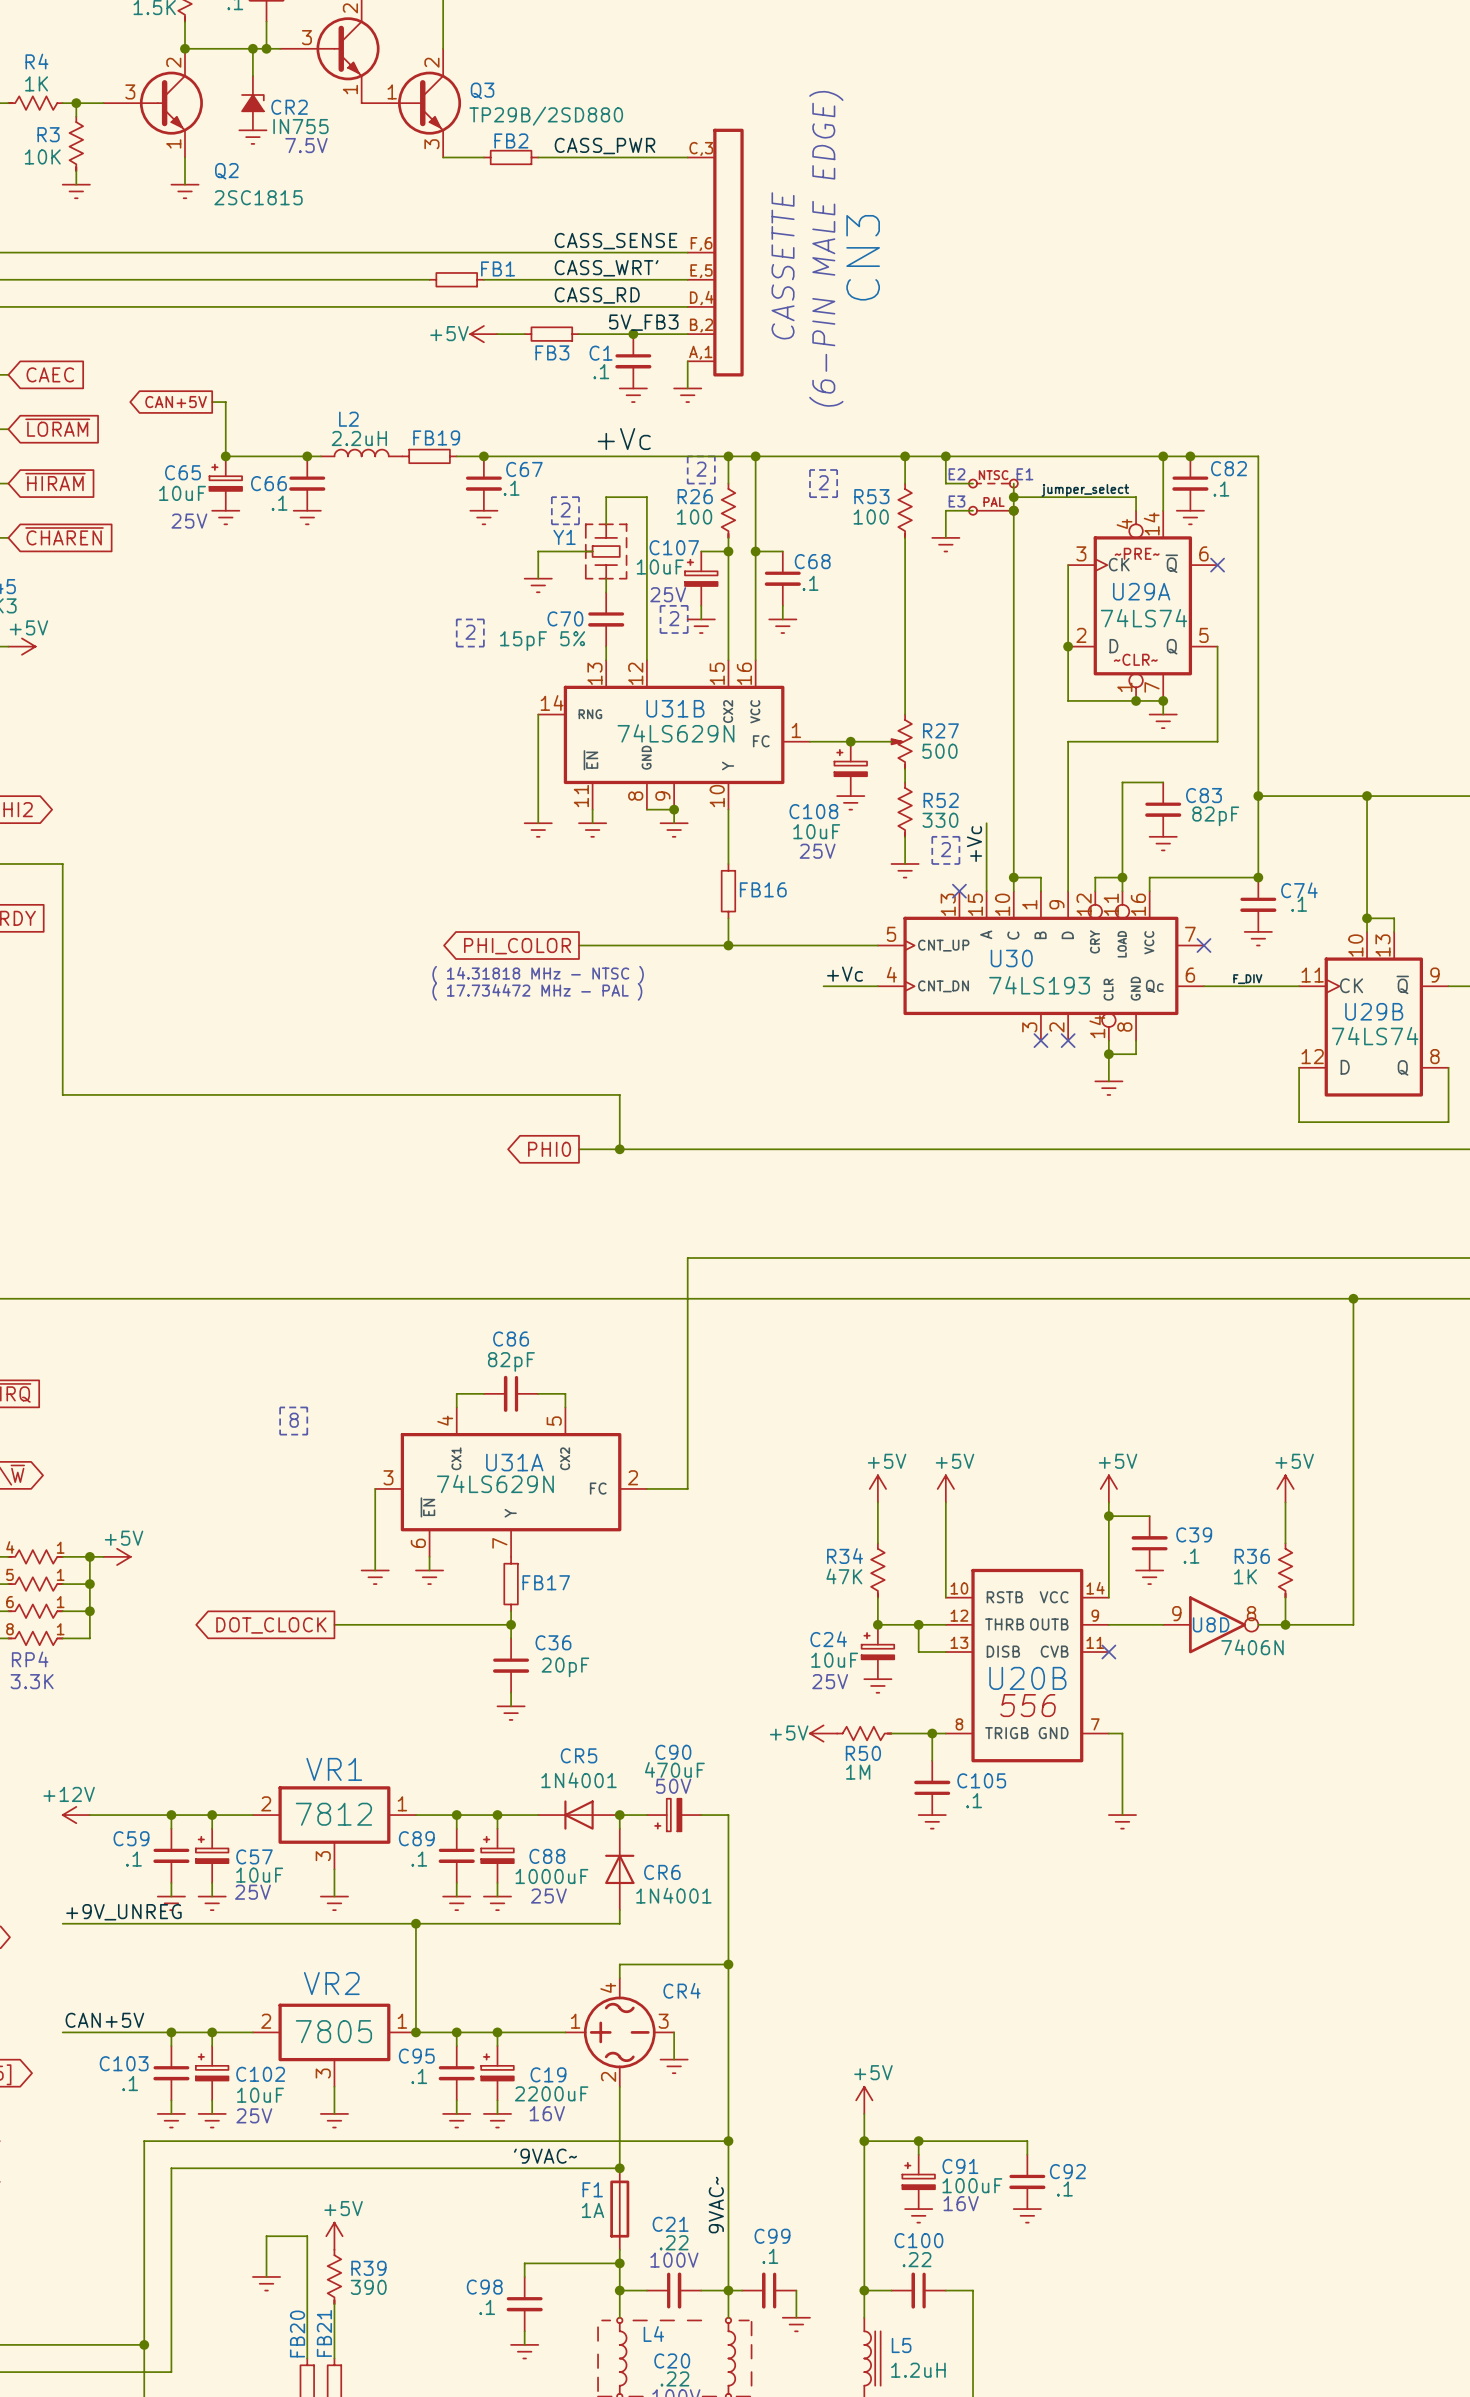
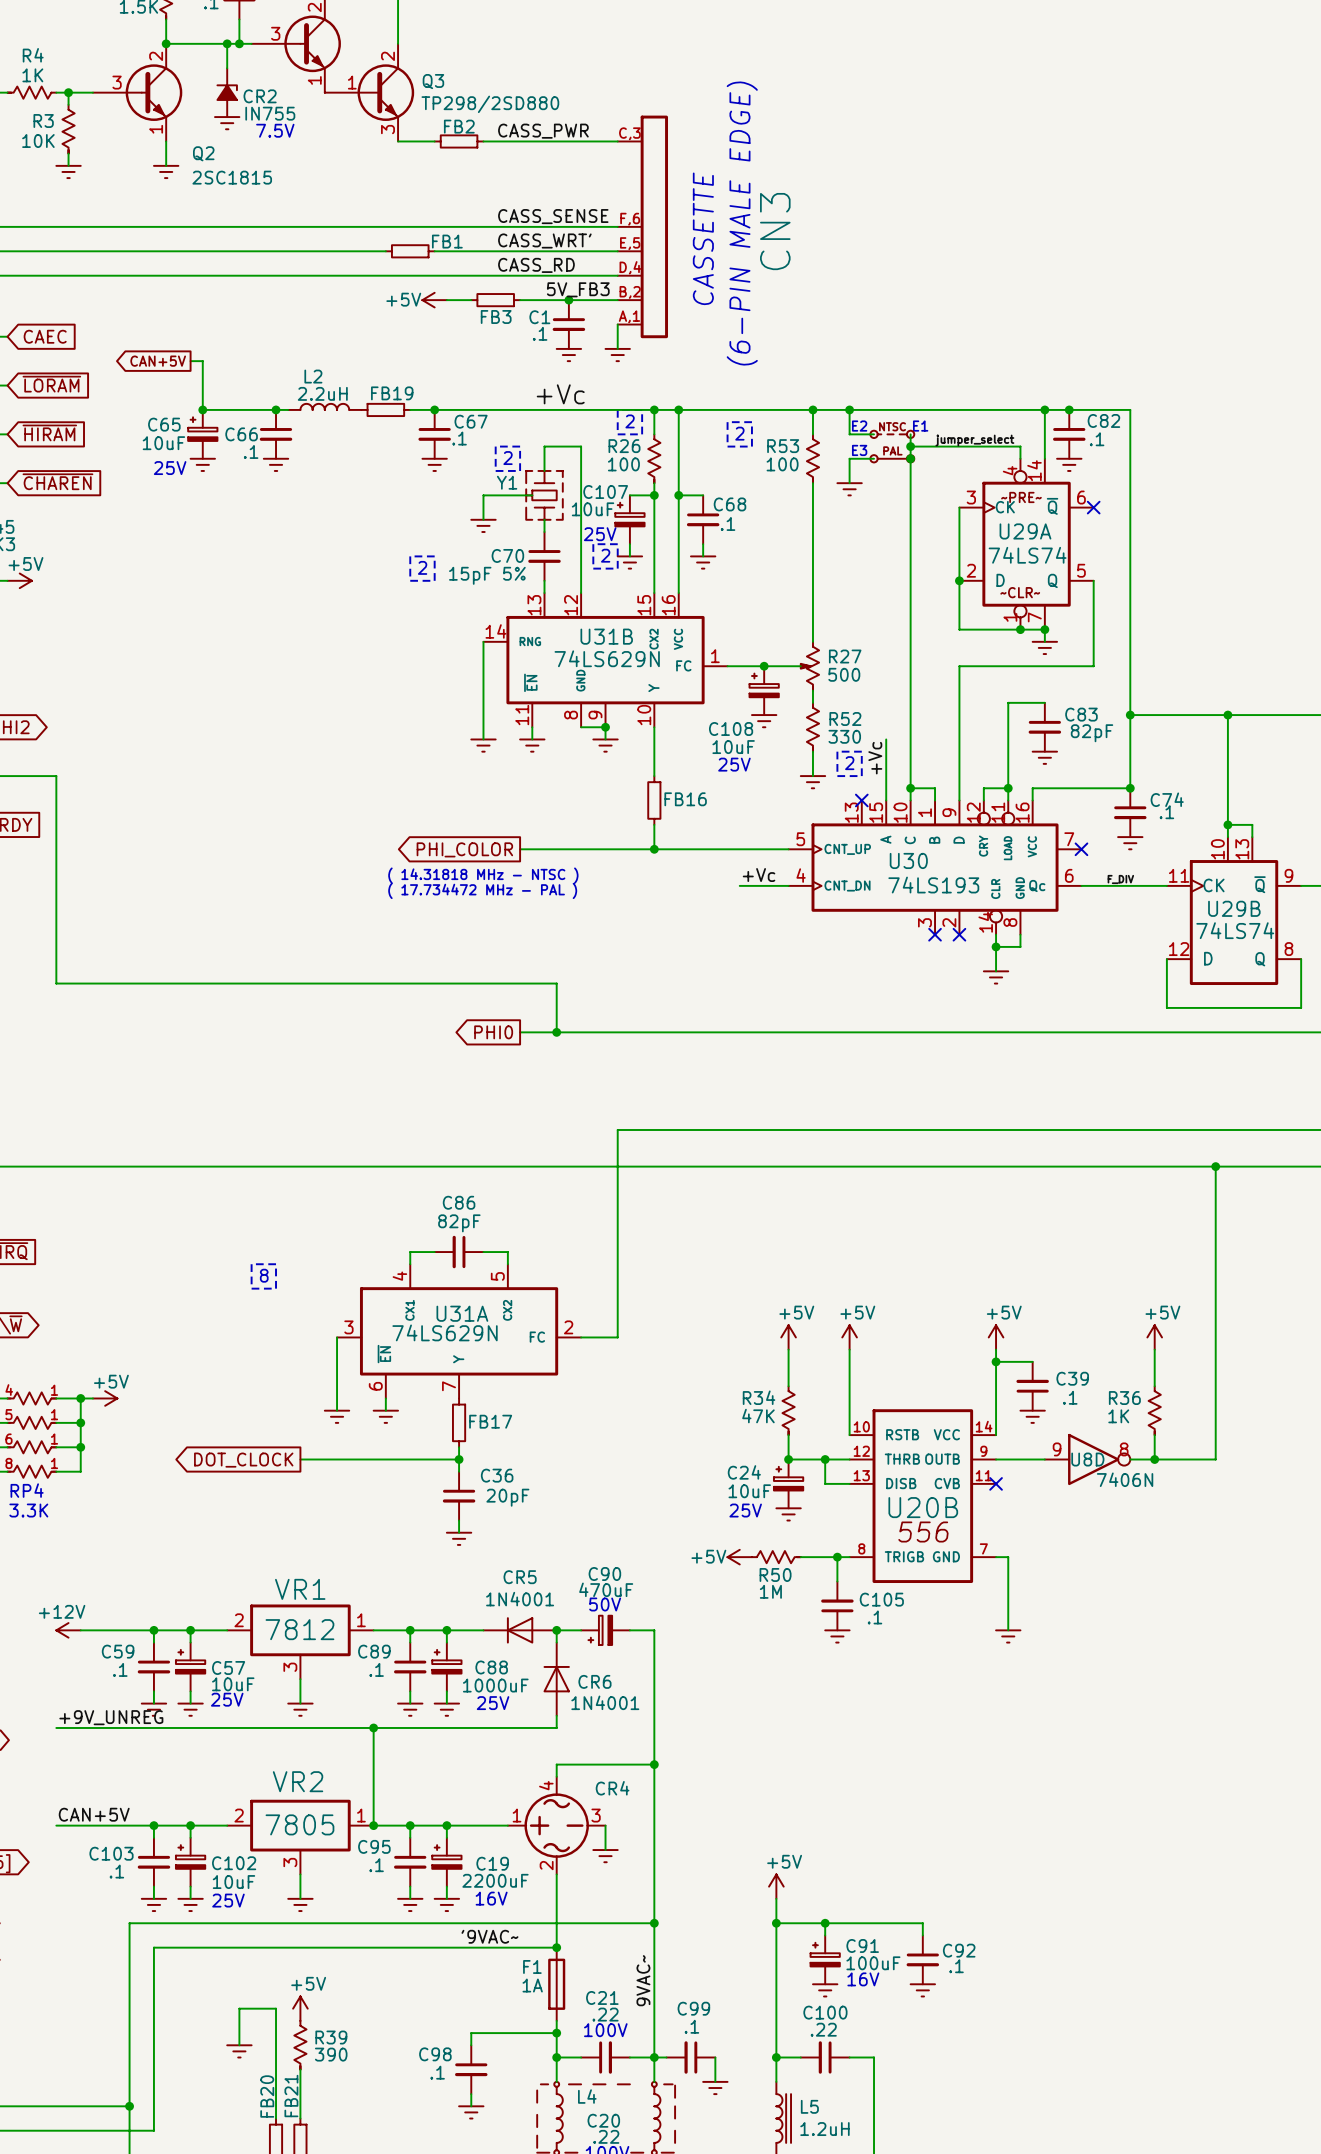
Q3 value: TP29B/2SD880 (546, 116) -> TP298/2SD880 (490, 104)

